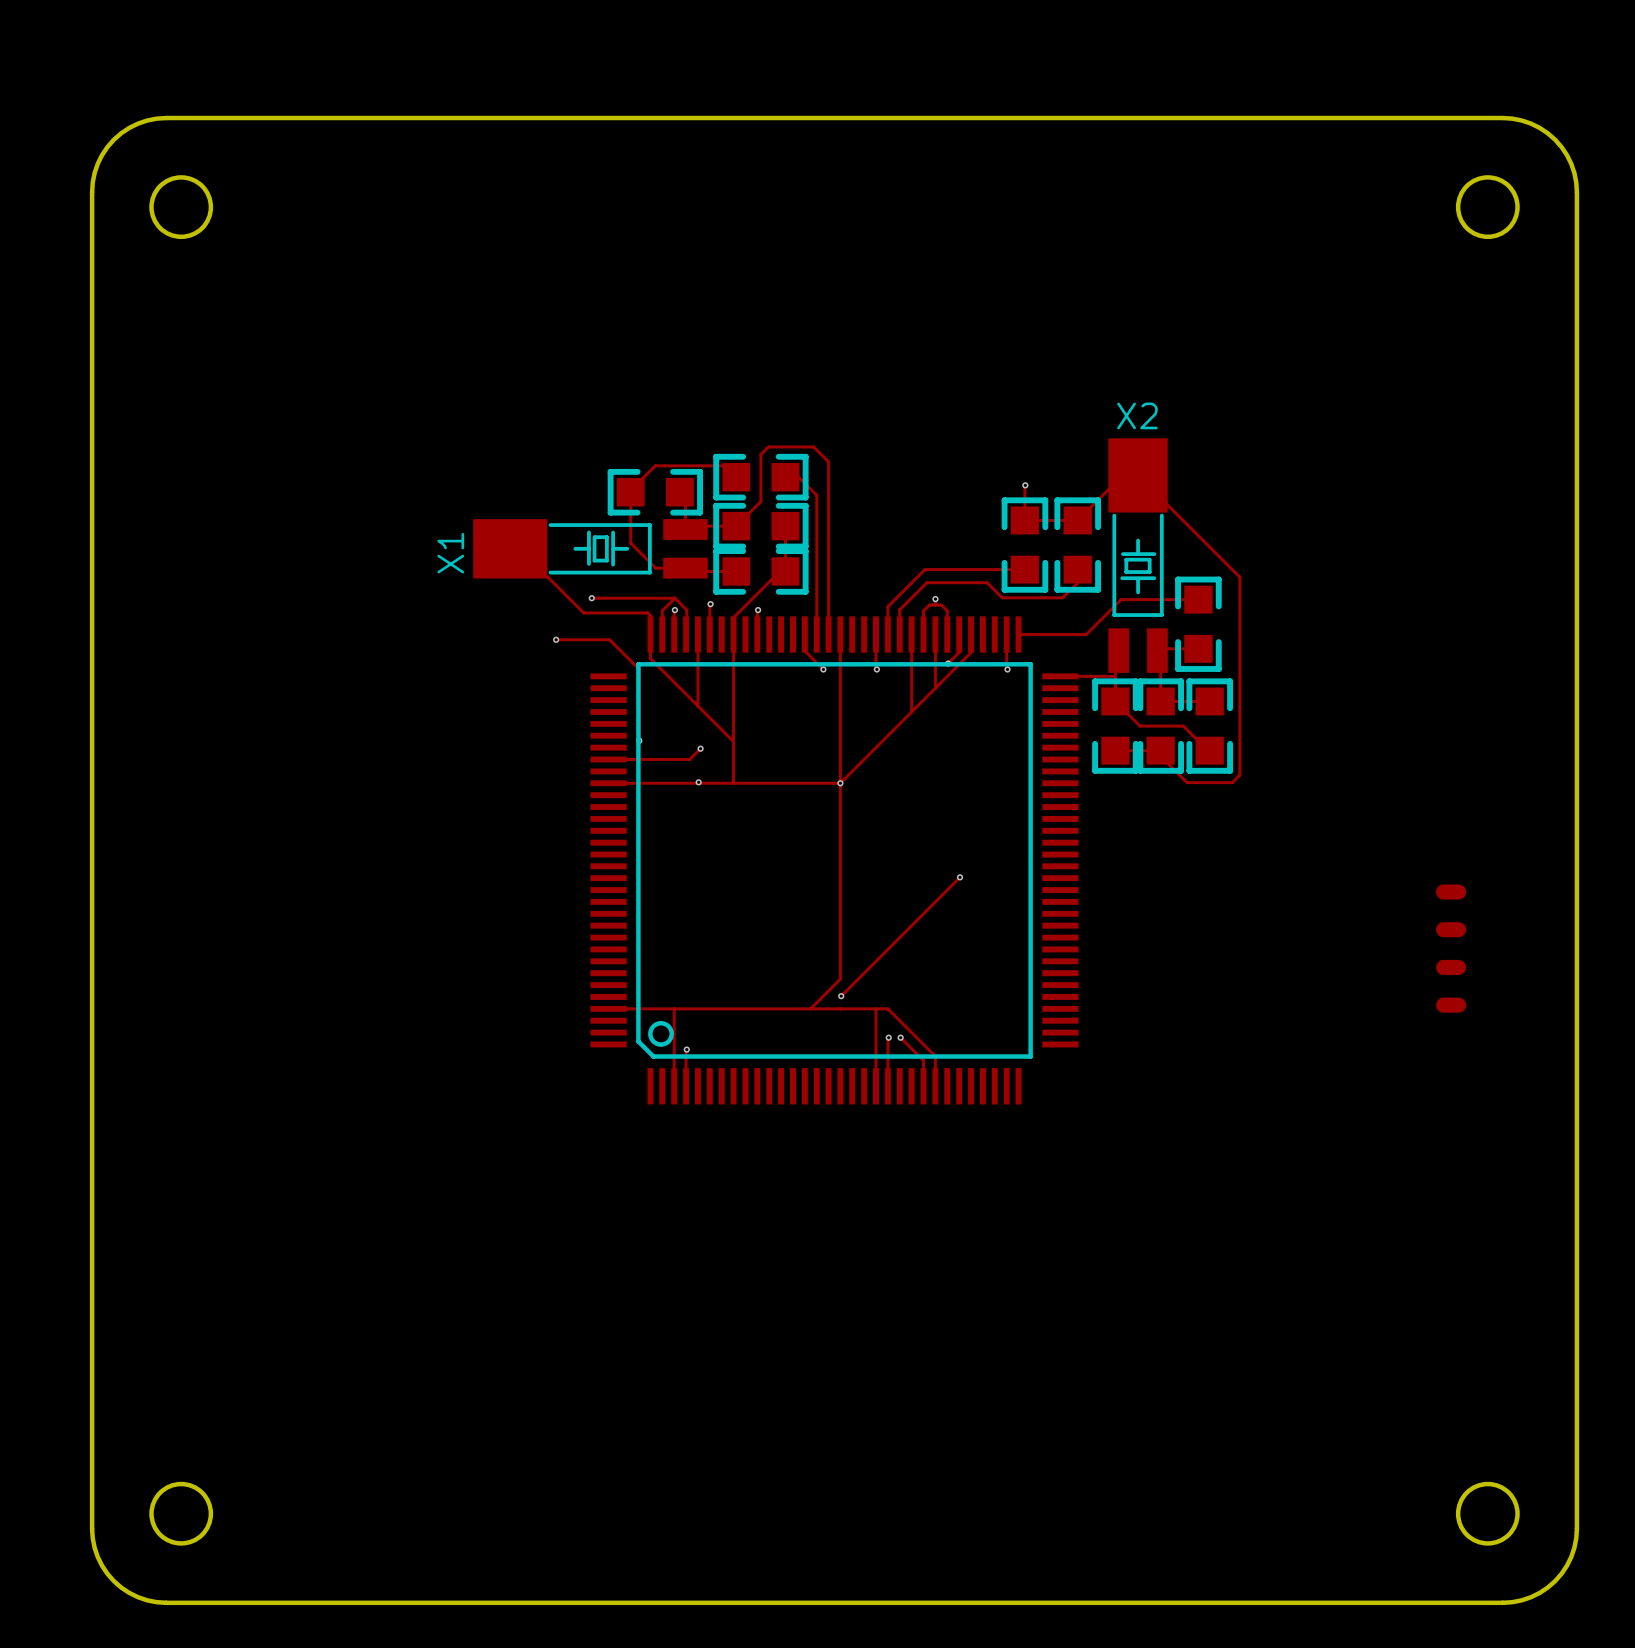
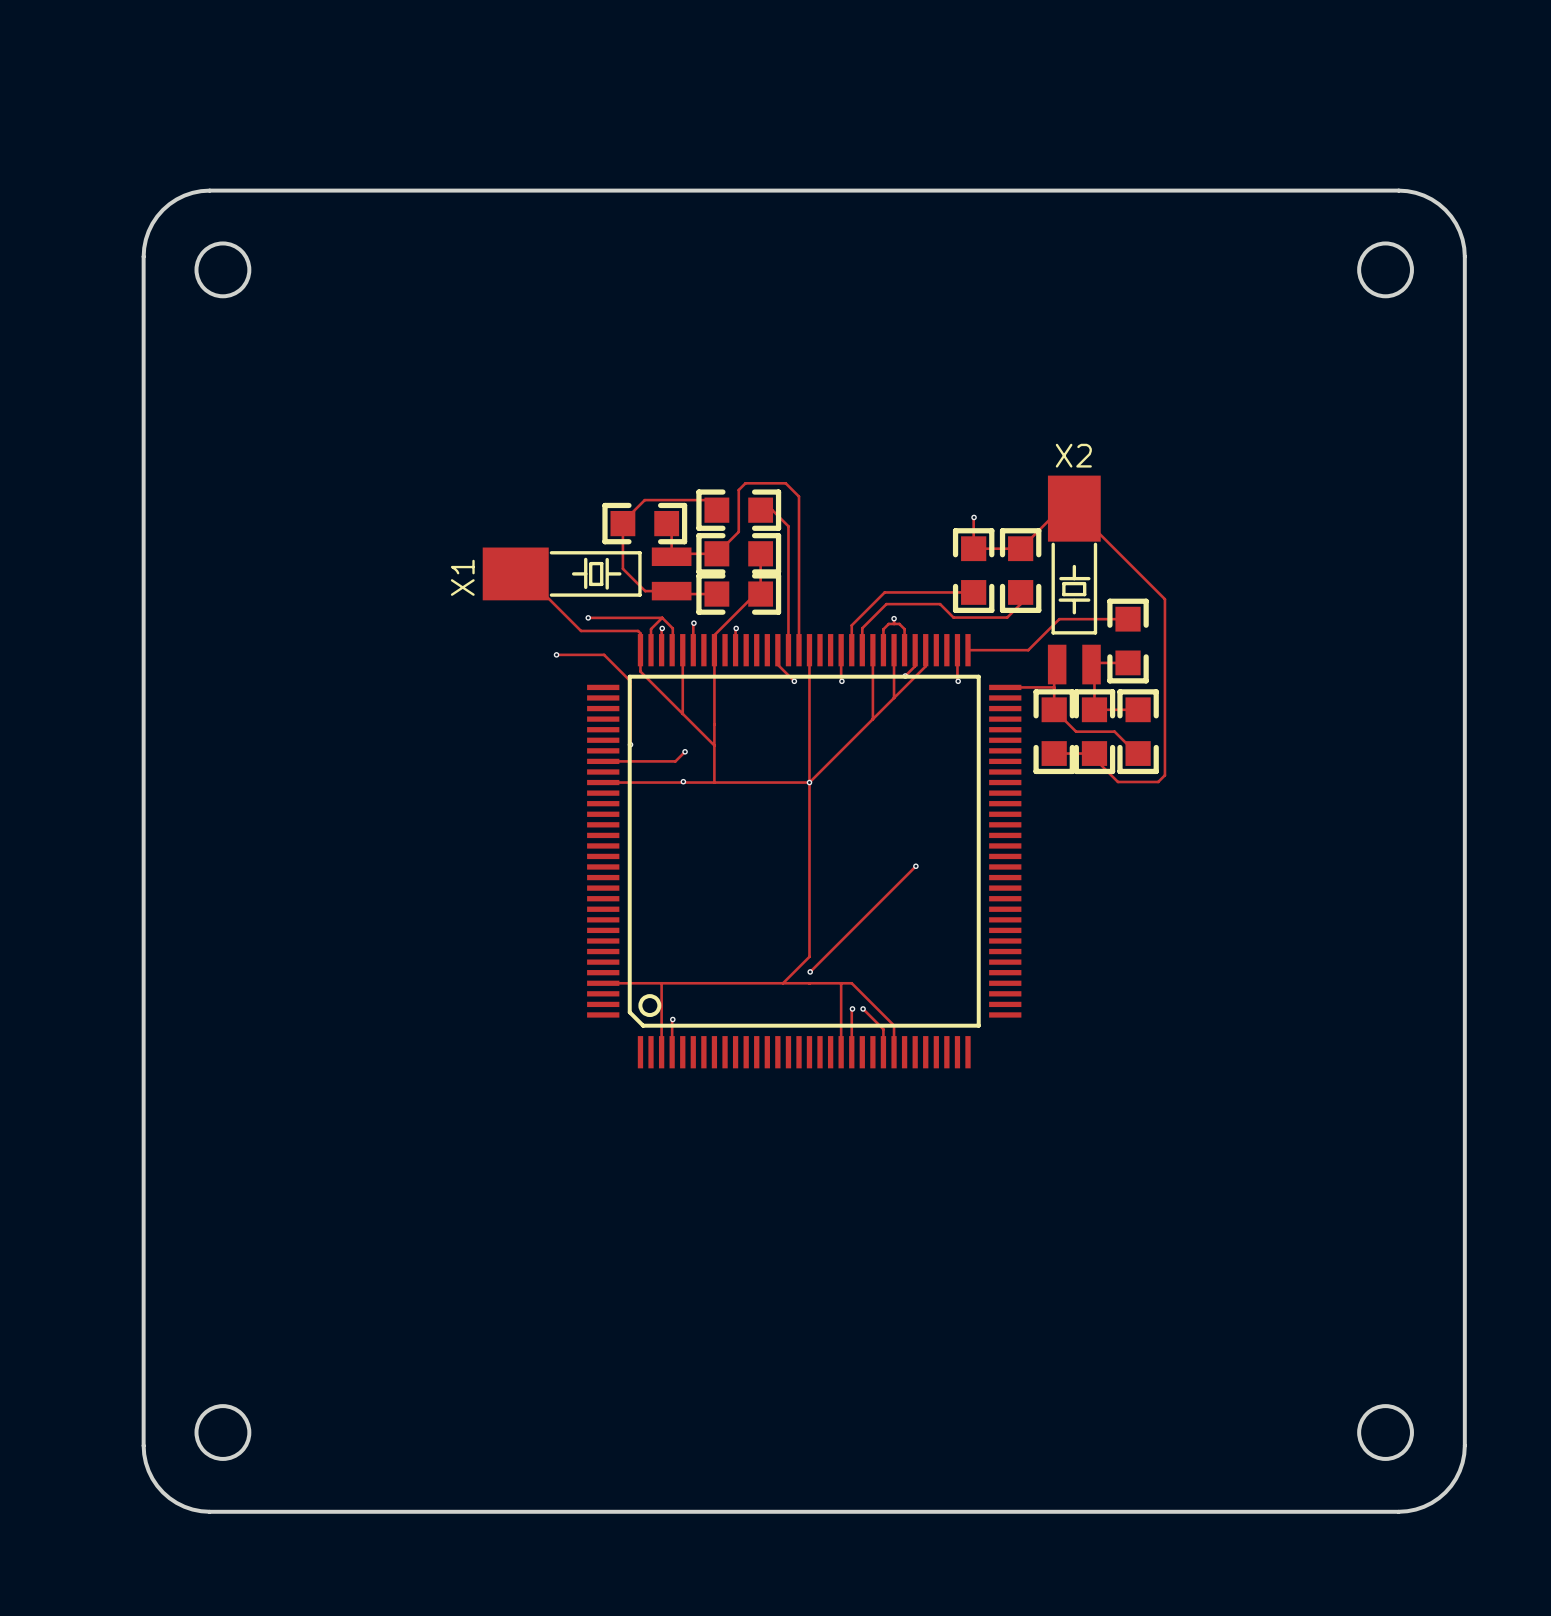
part: (1451, 892) -> none
part: (1451, 929) -> none
part: (1451, 967) -> none
part: (1451, 1005) -> none

